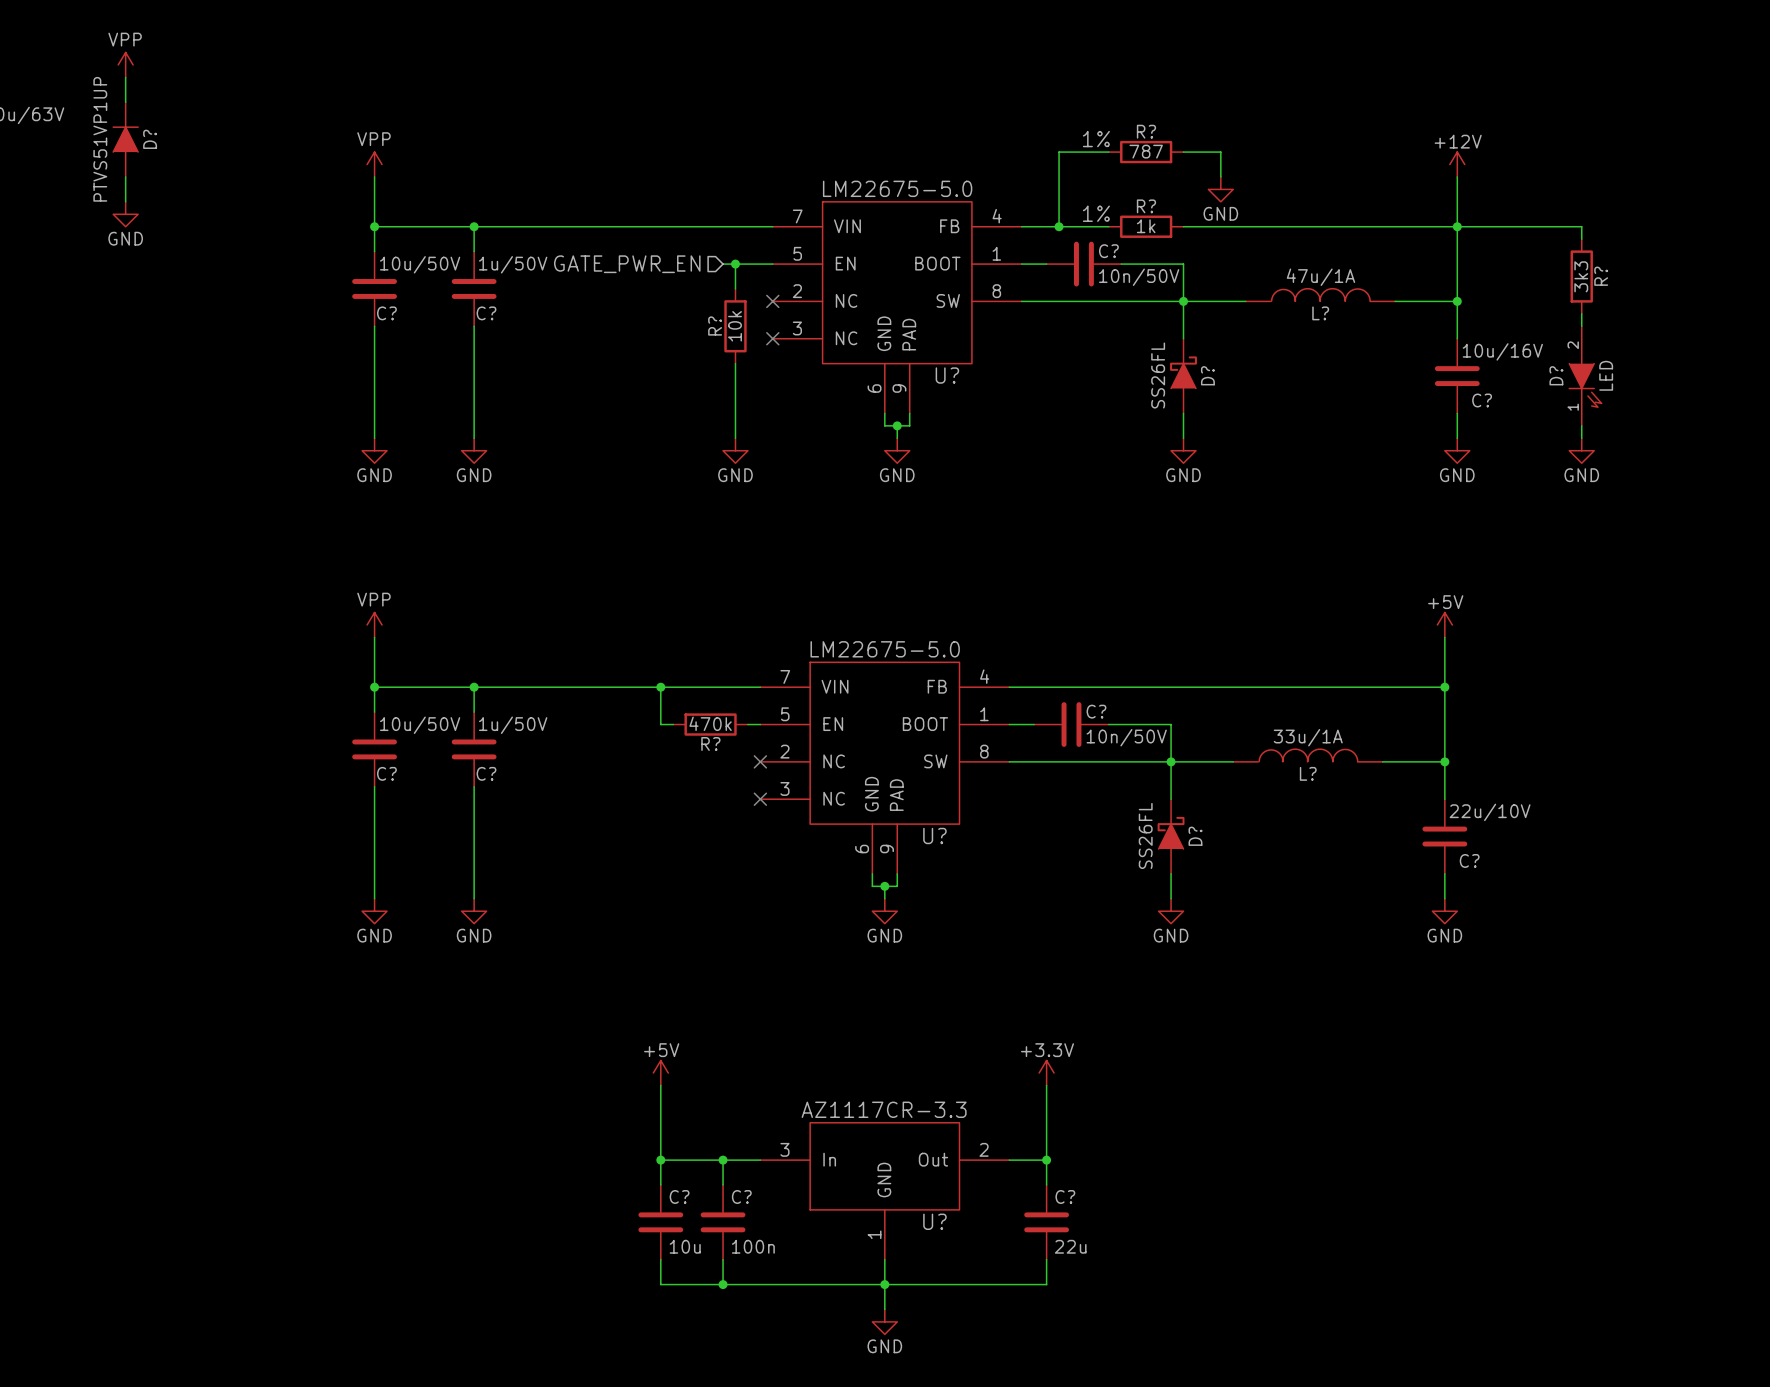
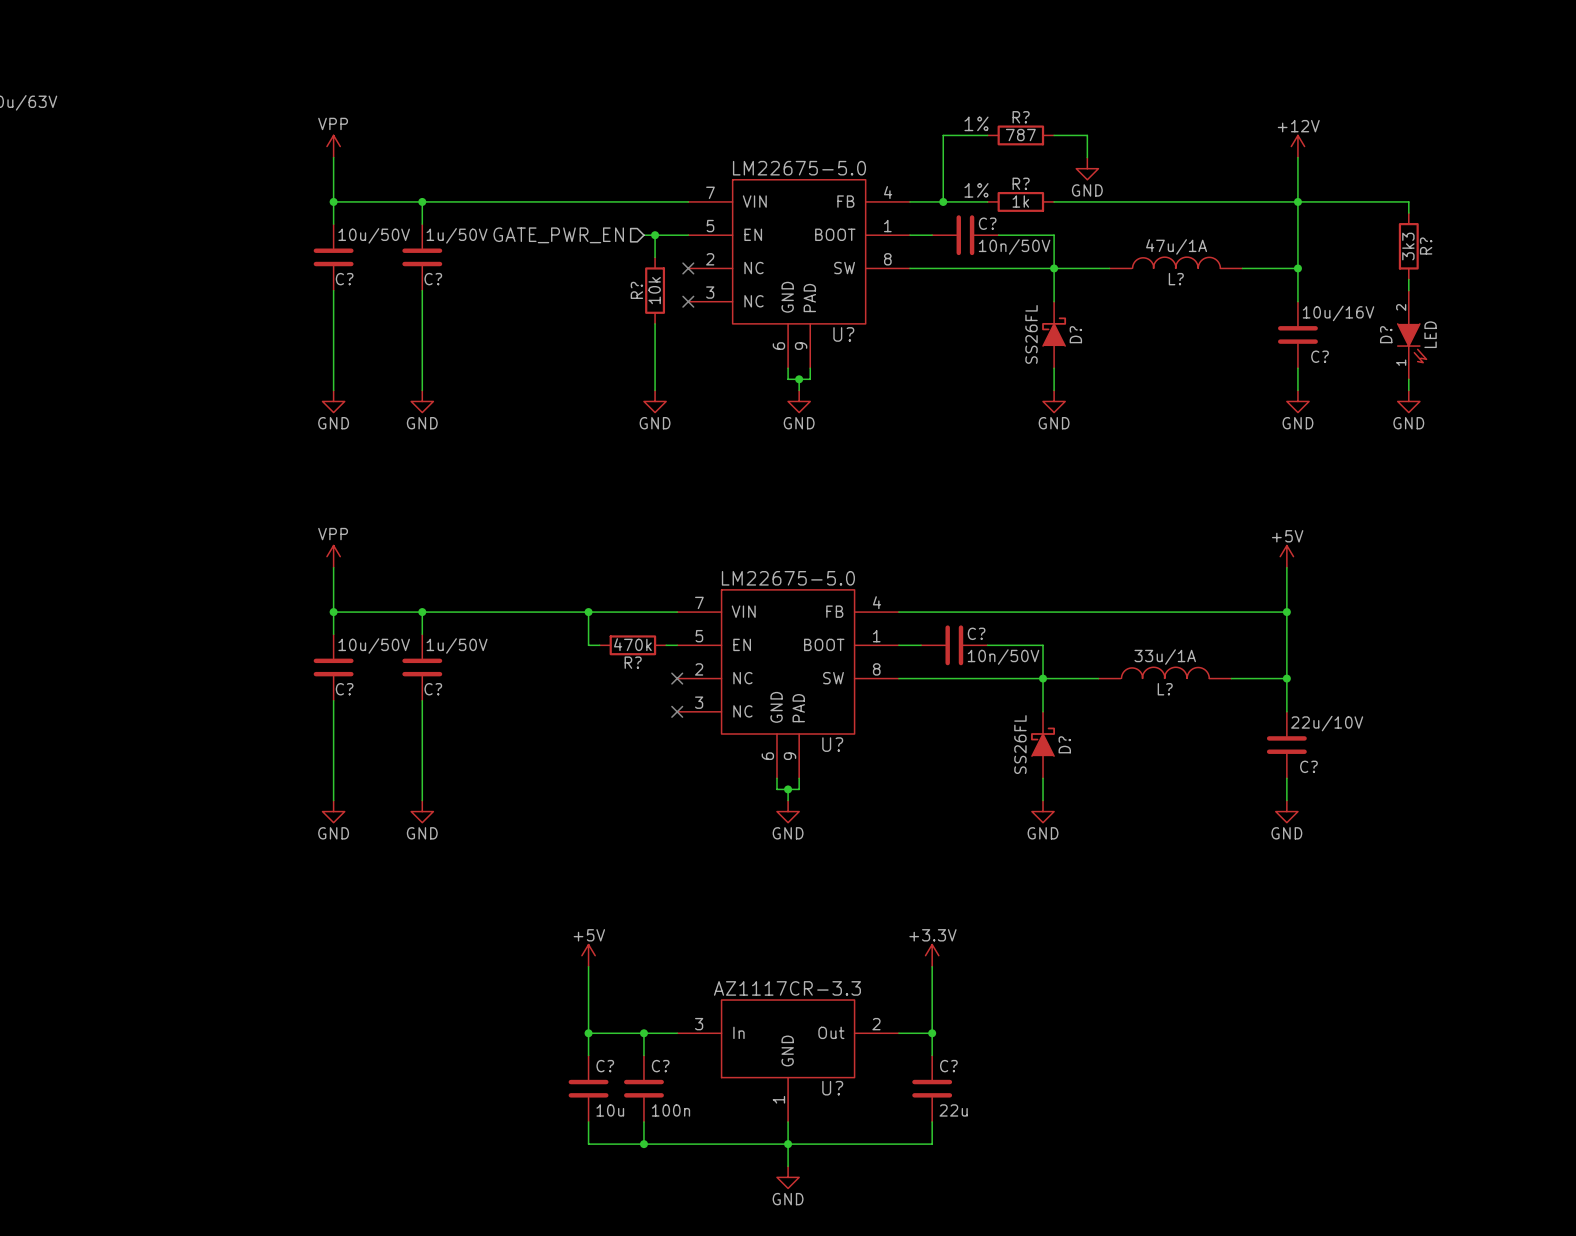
power symbol: VPP (125, 64) -> none
wire: (125, 77) (125, 102) -> none
D?: PTVS51VP1UP (125, 139) -> none
wire: (125, 176) (125, 201) -> none
power symbol: GND (125, 214) -> none

